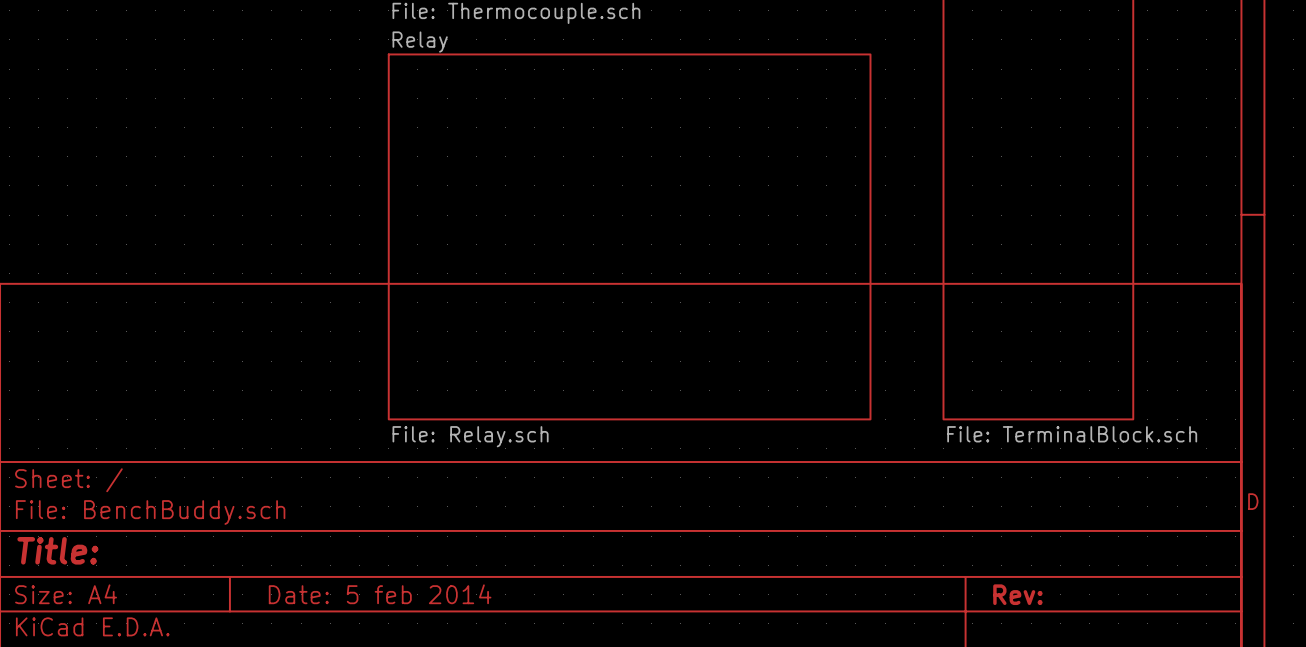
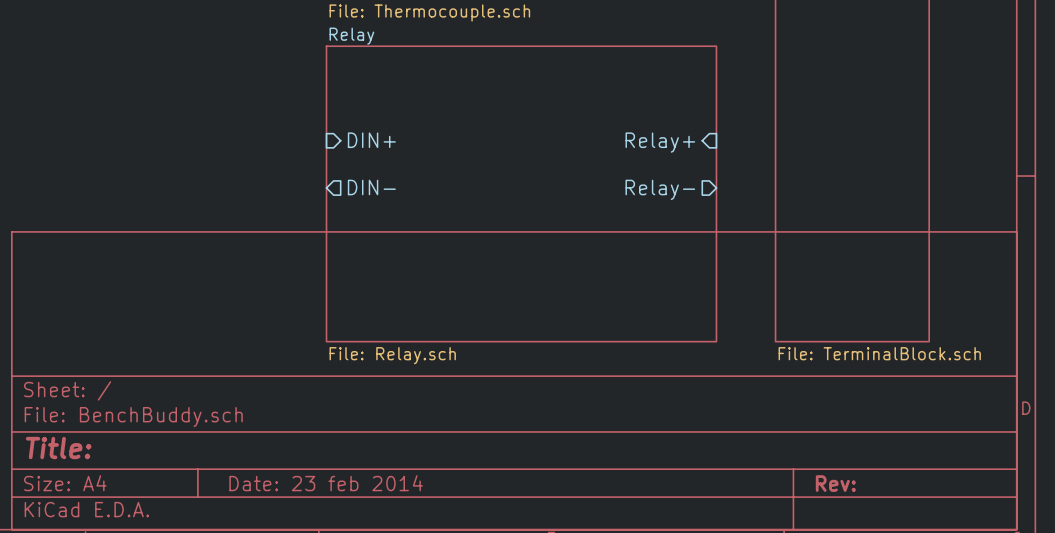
sheet pin: none -> DIN+ (371, 140)
sheet pin: none -> Relay+ (660, 142)
sheet pin: none -> DIN- (371, 187)
sheet pin: none -> Relay- (660, 189)
title block: Date: 5 feb 2014 (380, 594) -> Date: 23 feb 2014 (326, 483)

